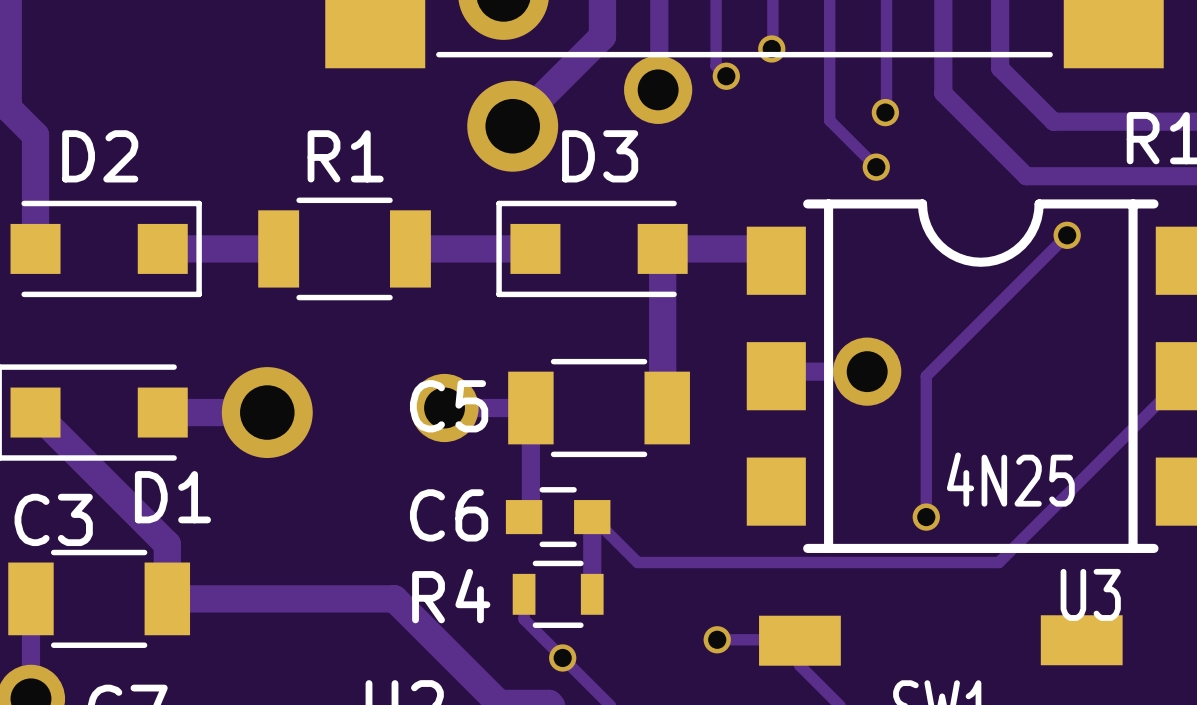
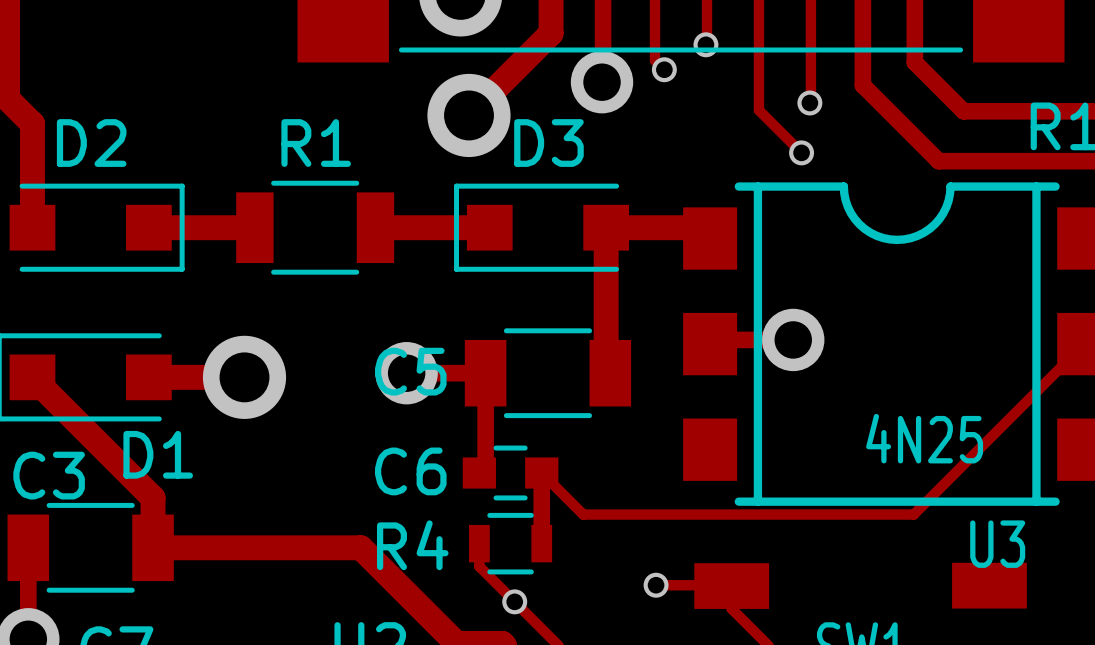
track: (1067, 235) (926, 376) (926, 517) -> none
via: (1067, 235) -> none
via: (926, 517) -> none

